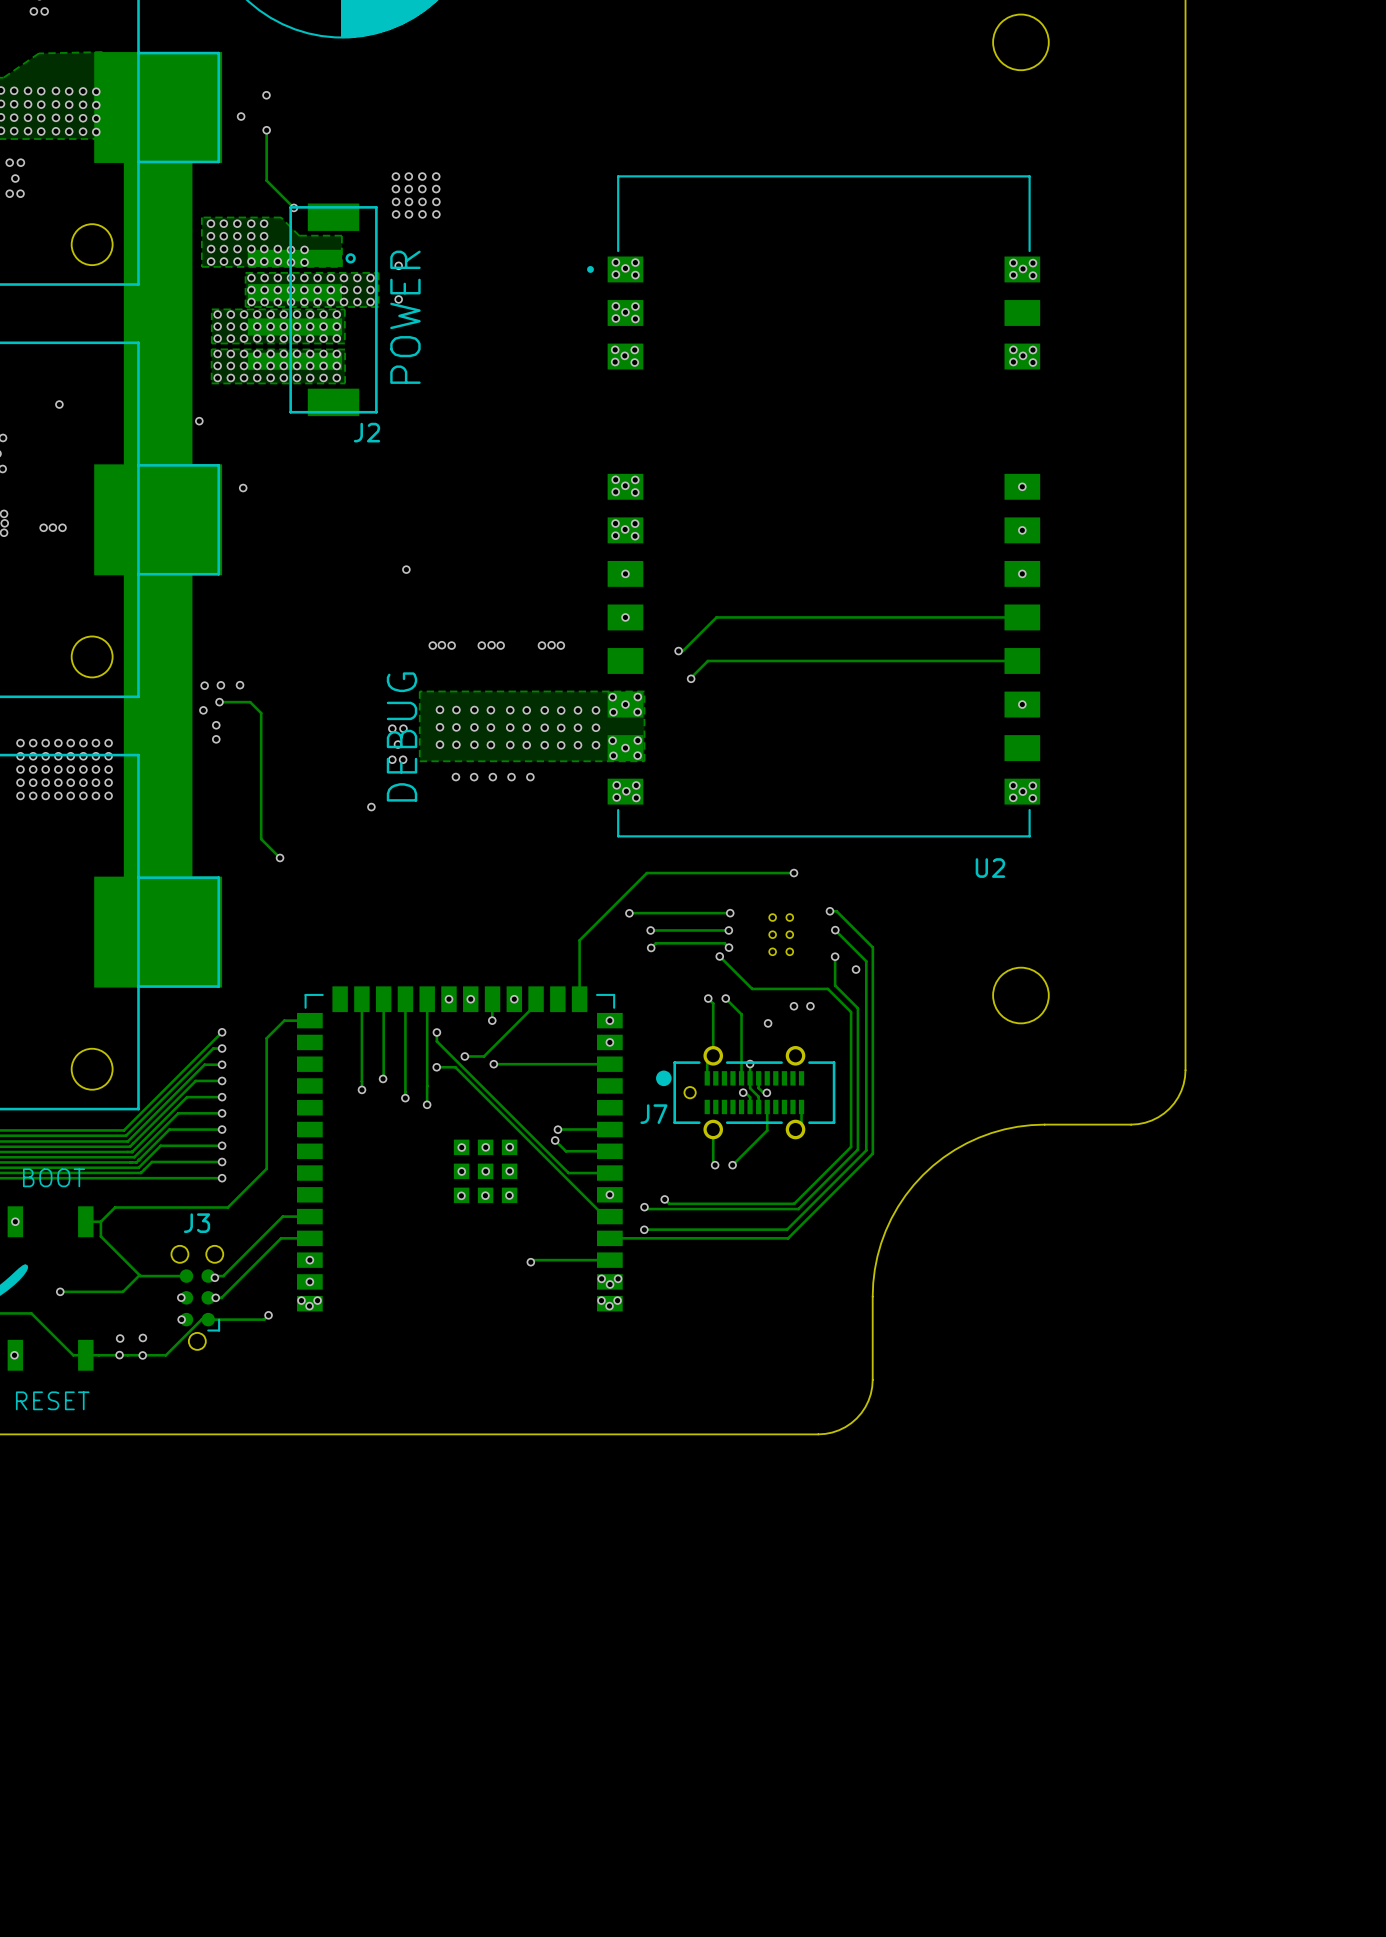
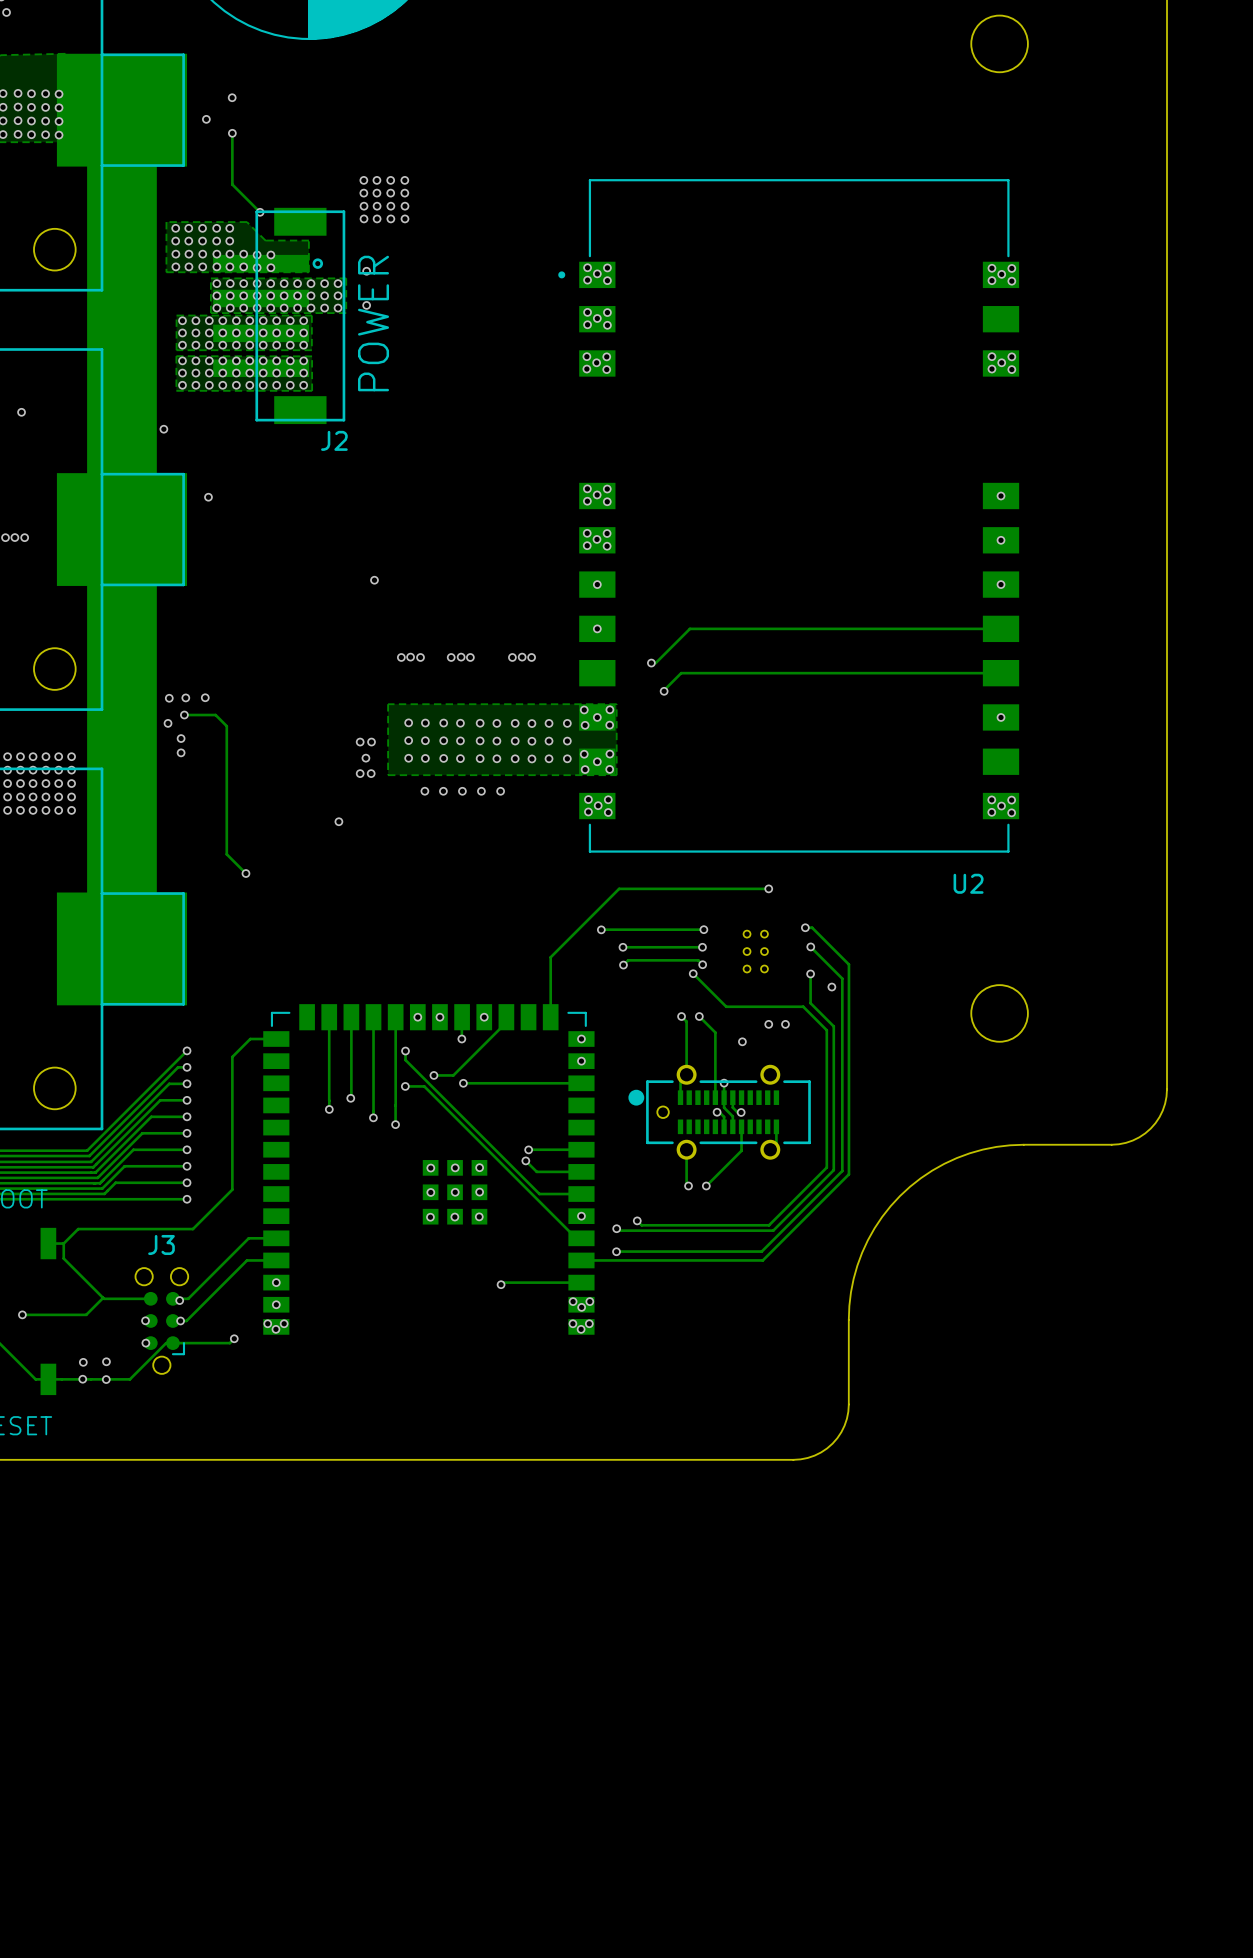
text: DEBUG (402, 736) -> none
J7 name: J7 (653, 1114) -> none

